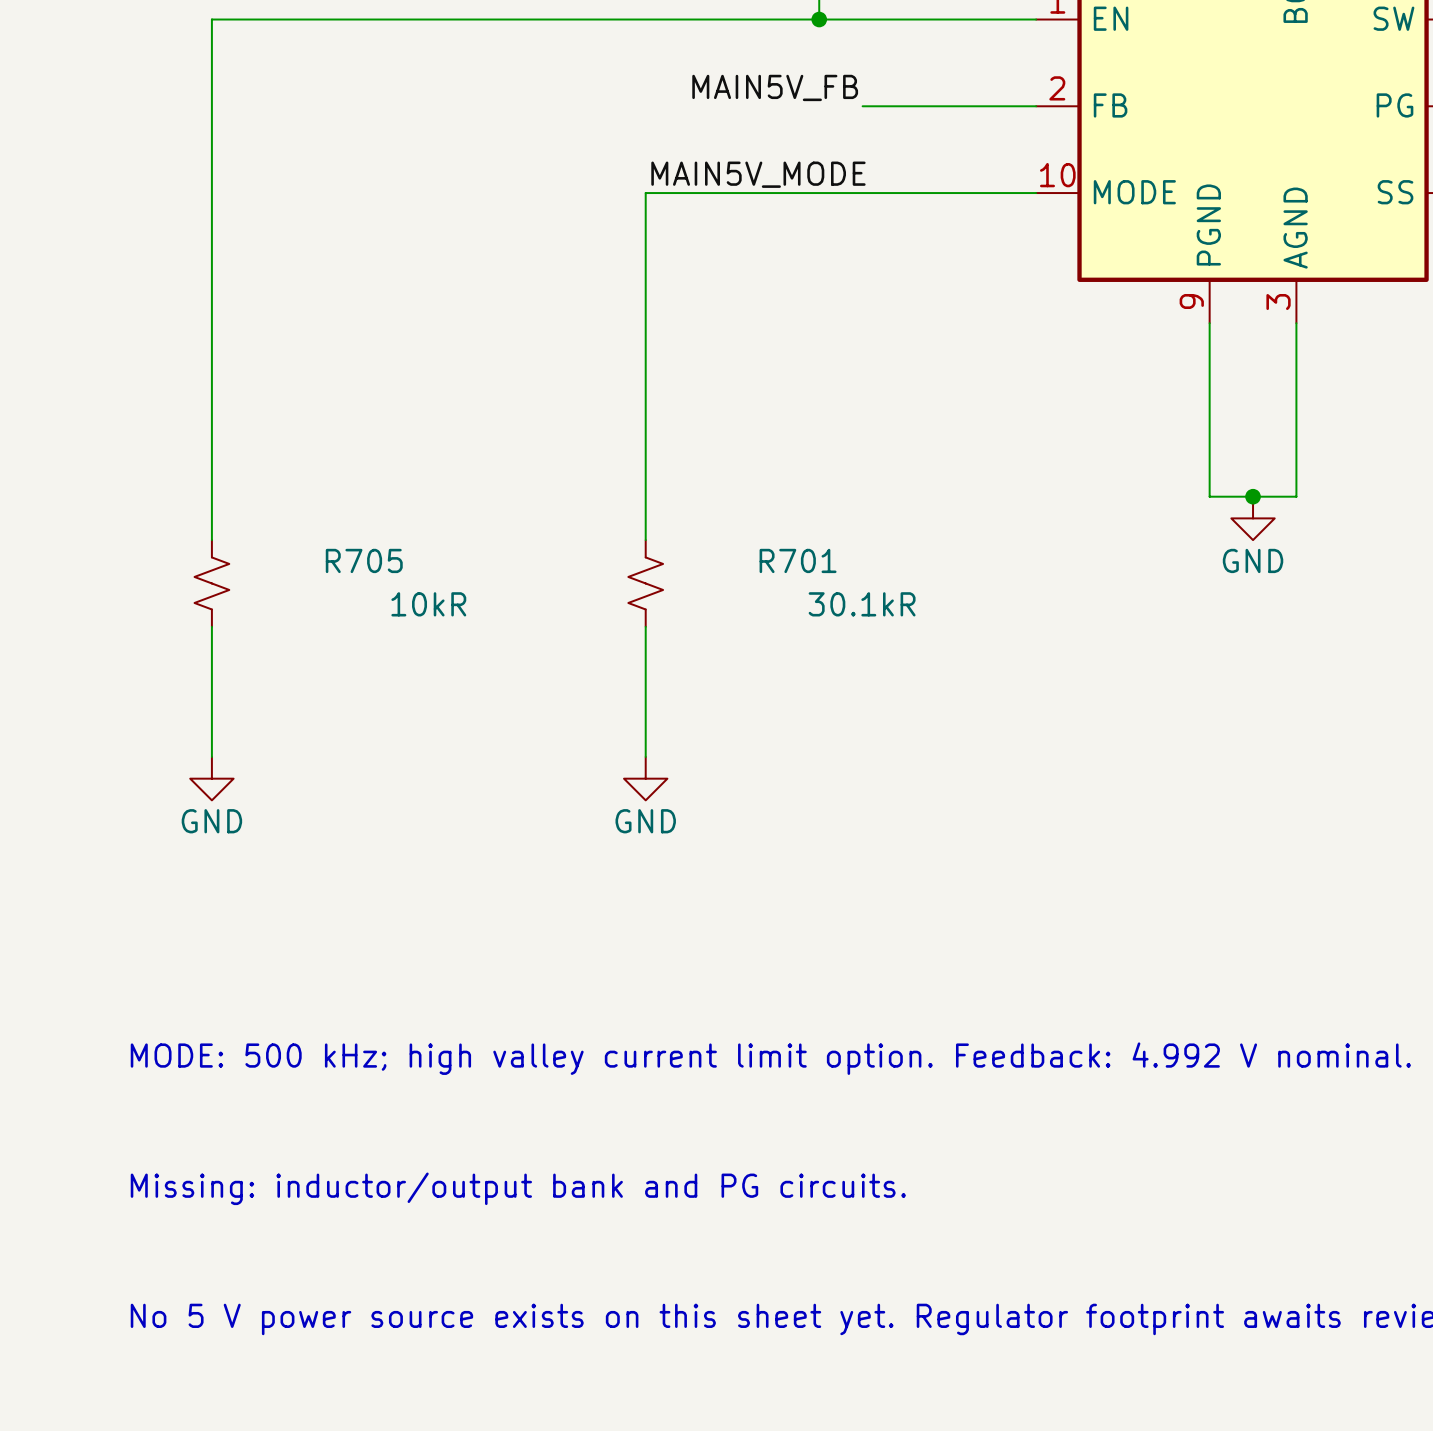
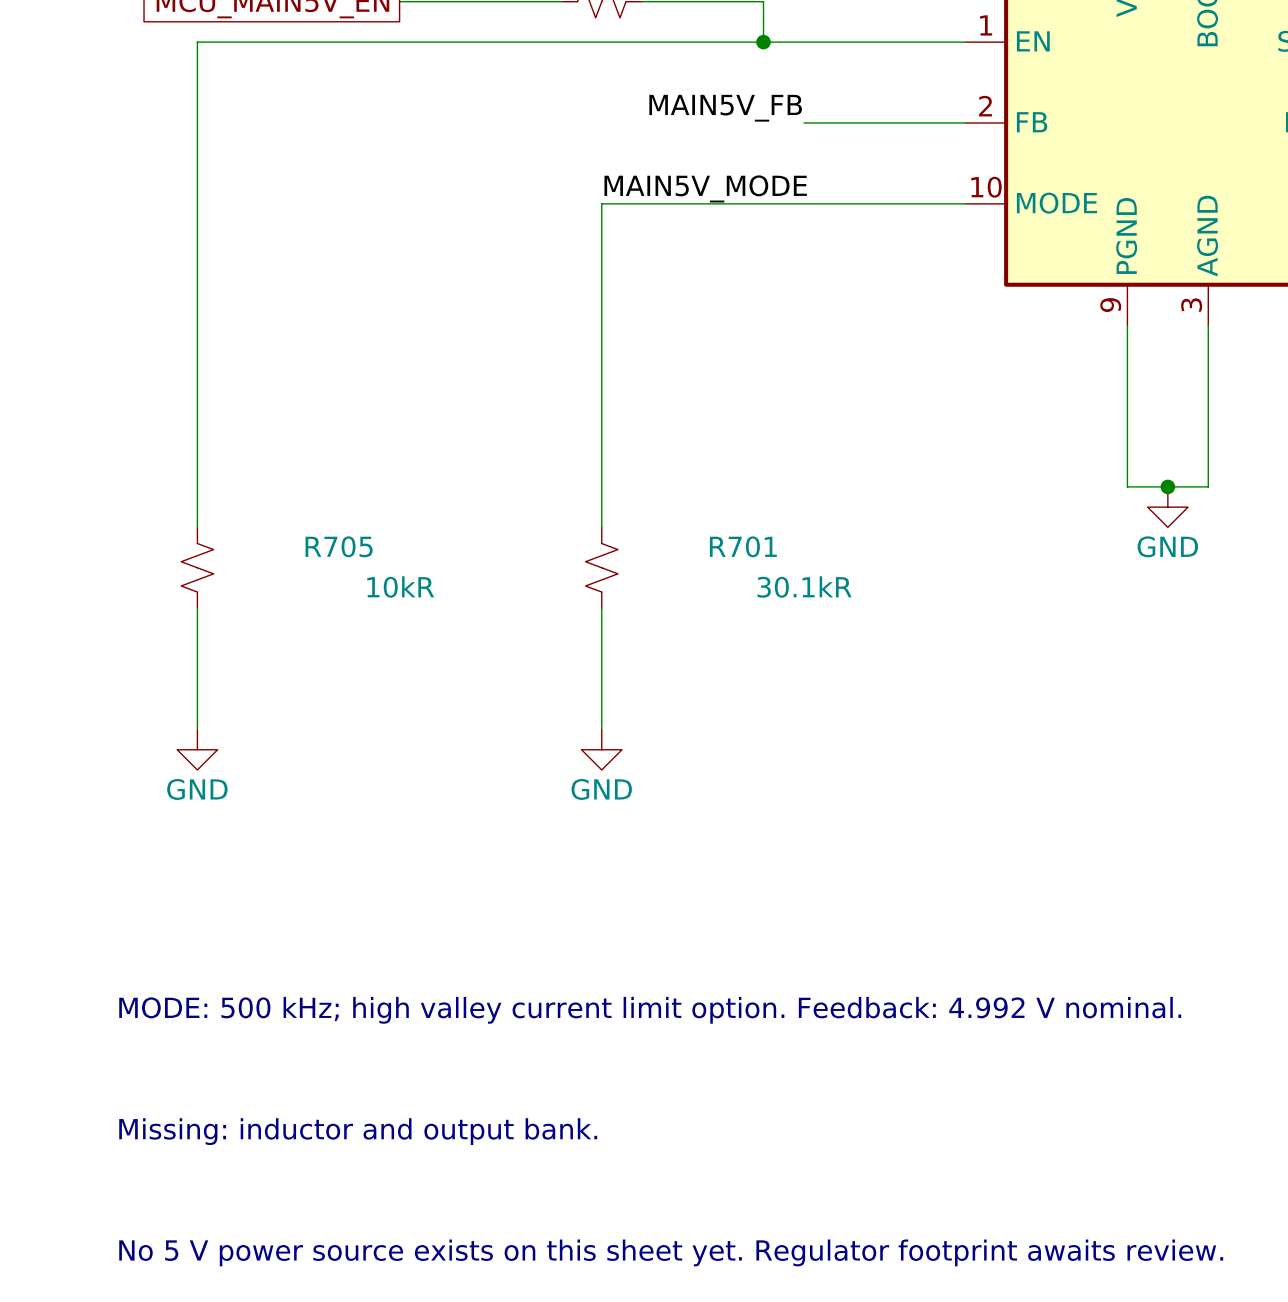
text: Missing: inductor/output bank and PG circuits. (518, 1188) -> Missing: inductor and output bank. (358, 1131)

